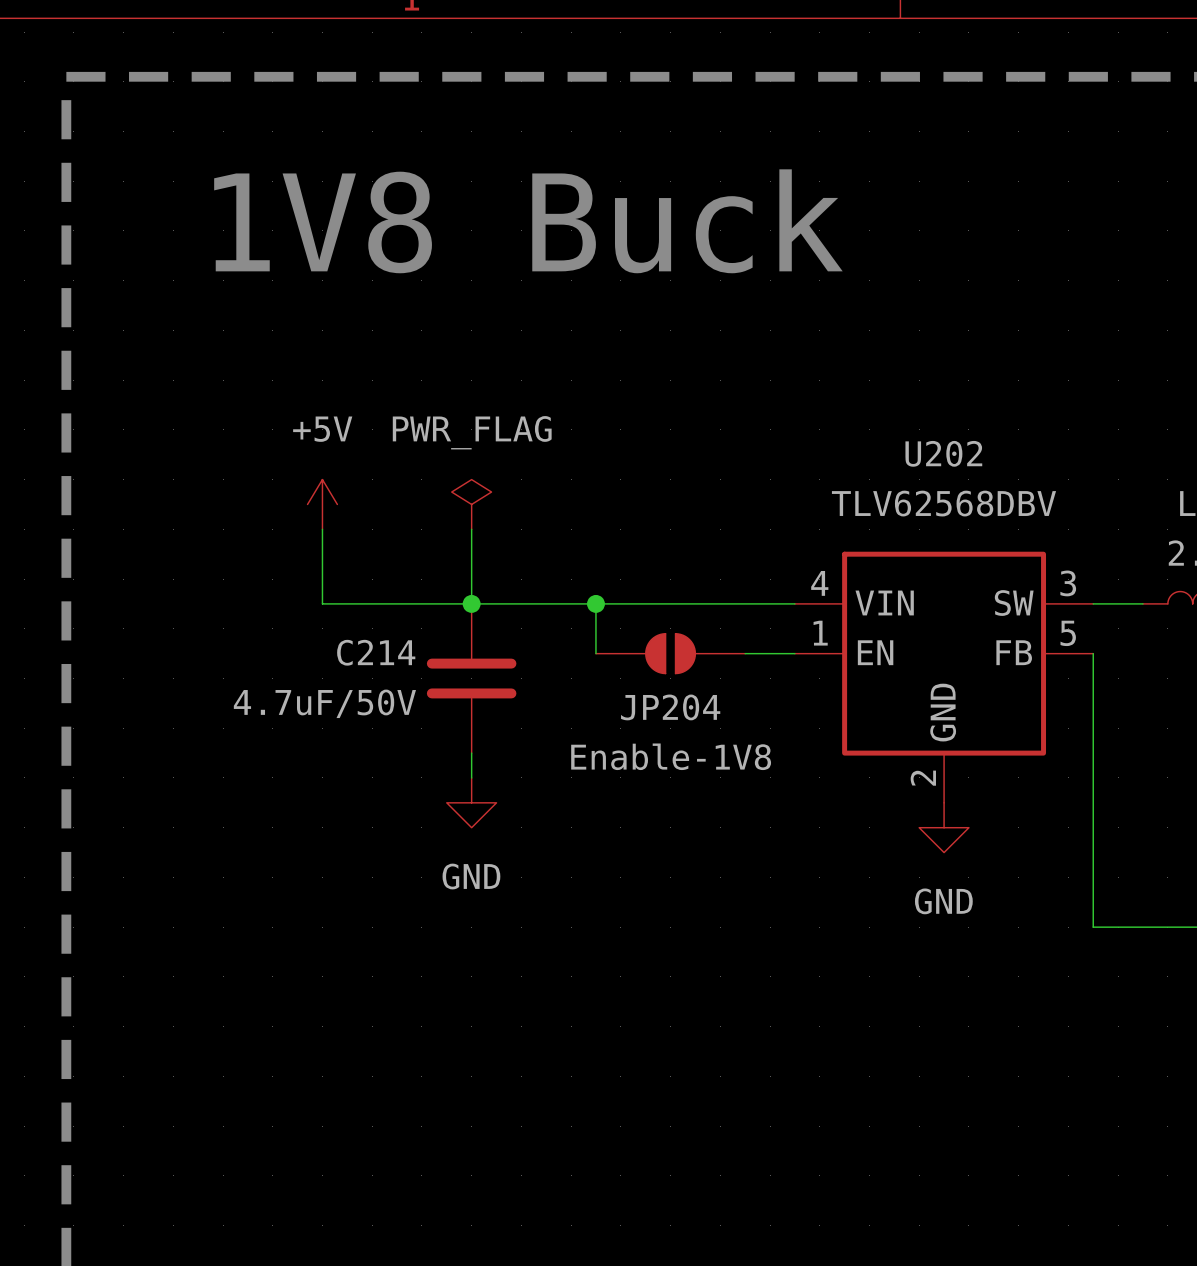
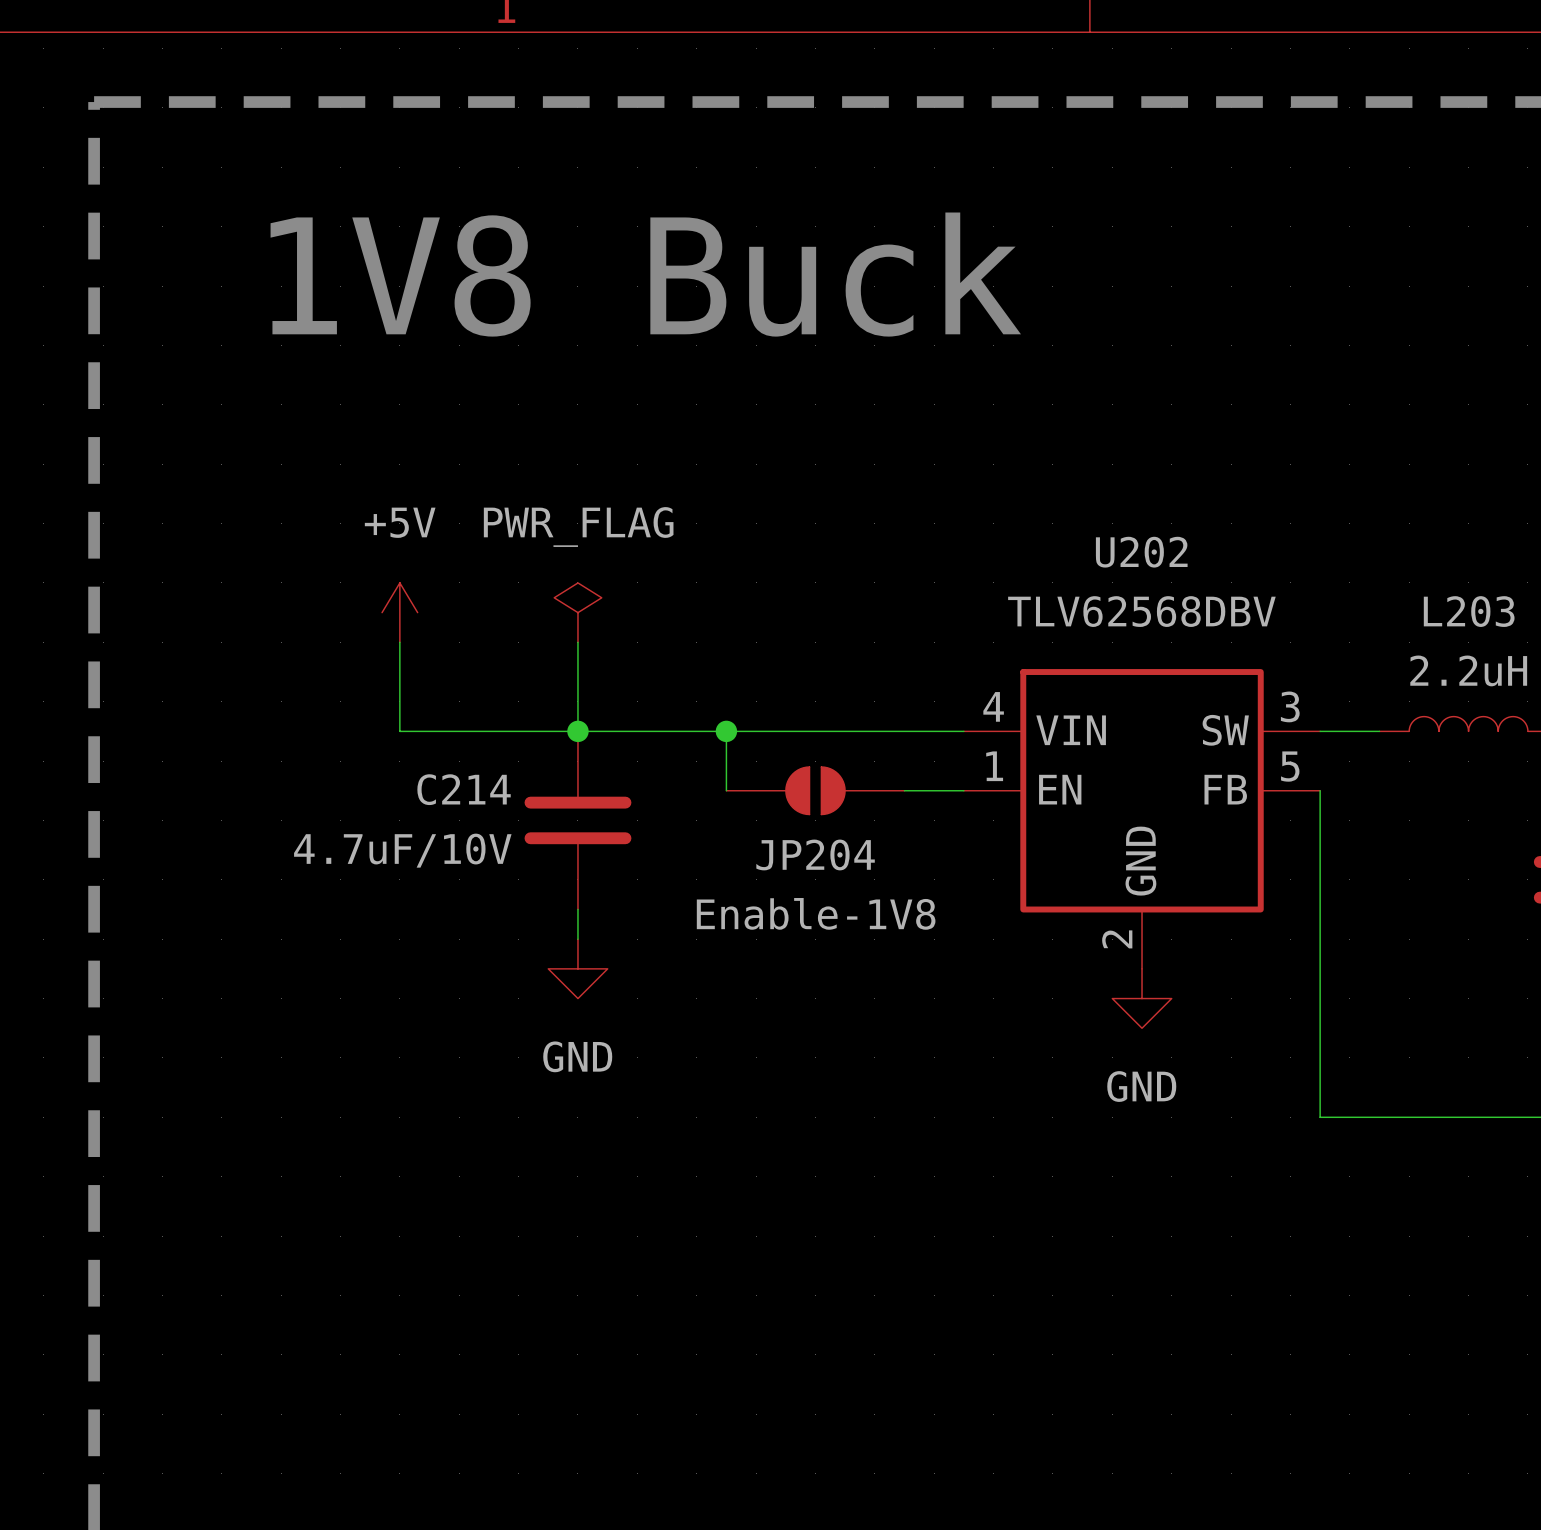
C214 value: 4.7uF/50V (324, 703) -> 4.7uF/10V (402, 850)

